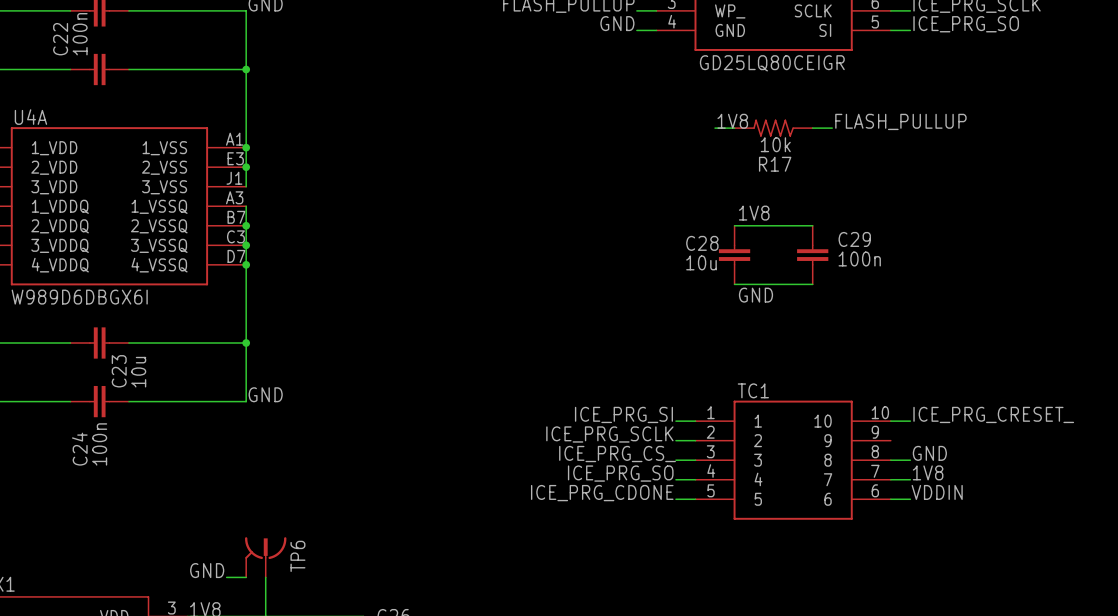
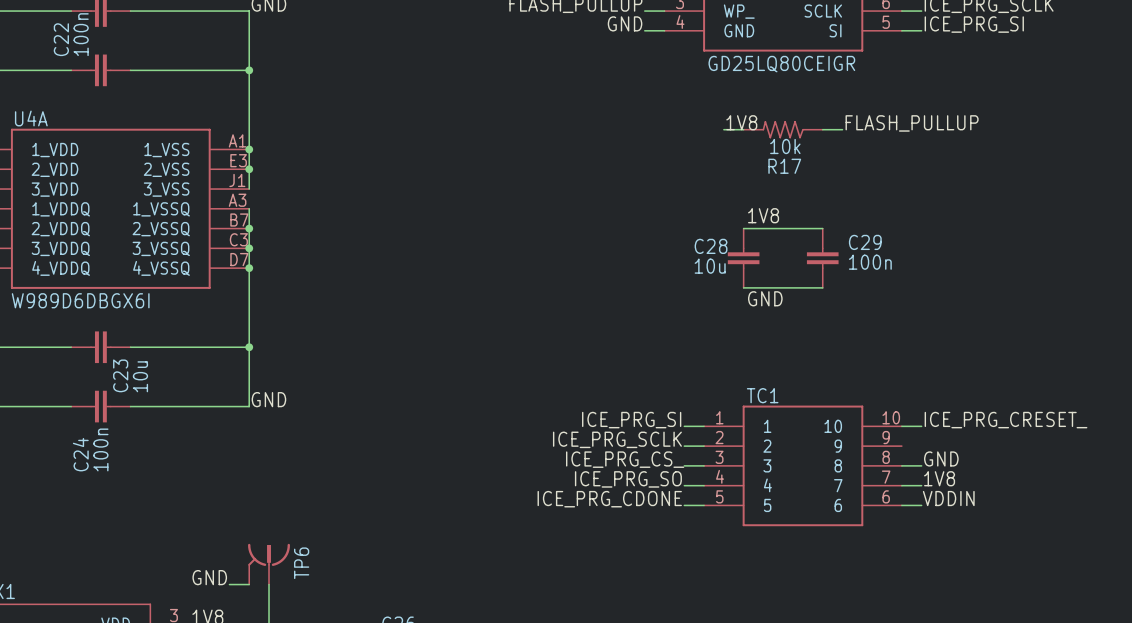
label: ICE_PRG_SO (966, 24) -> ICE_PRG_SI (974, 24)

